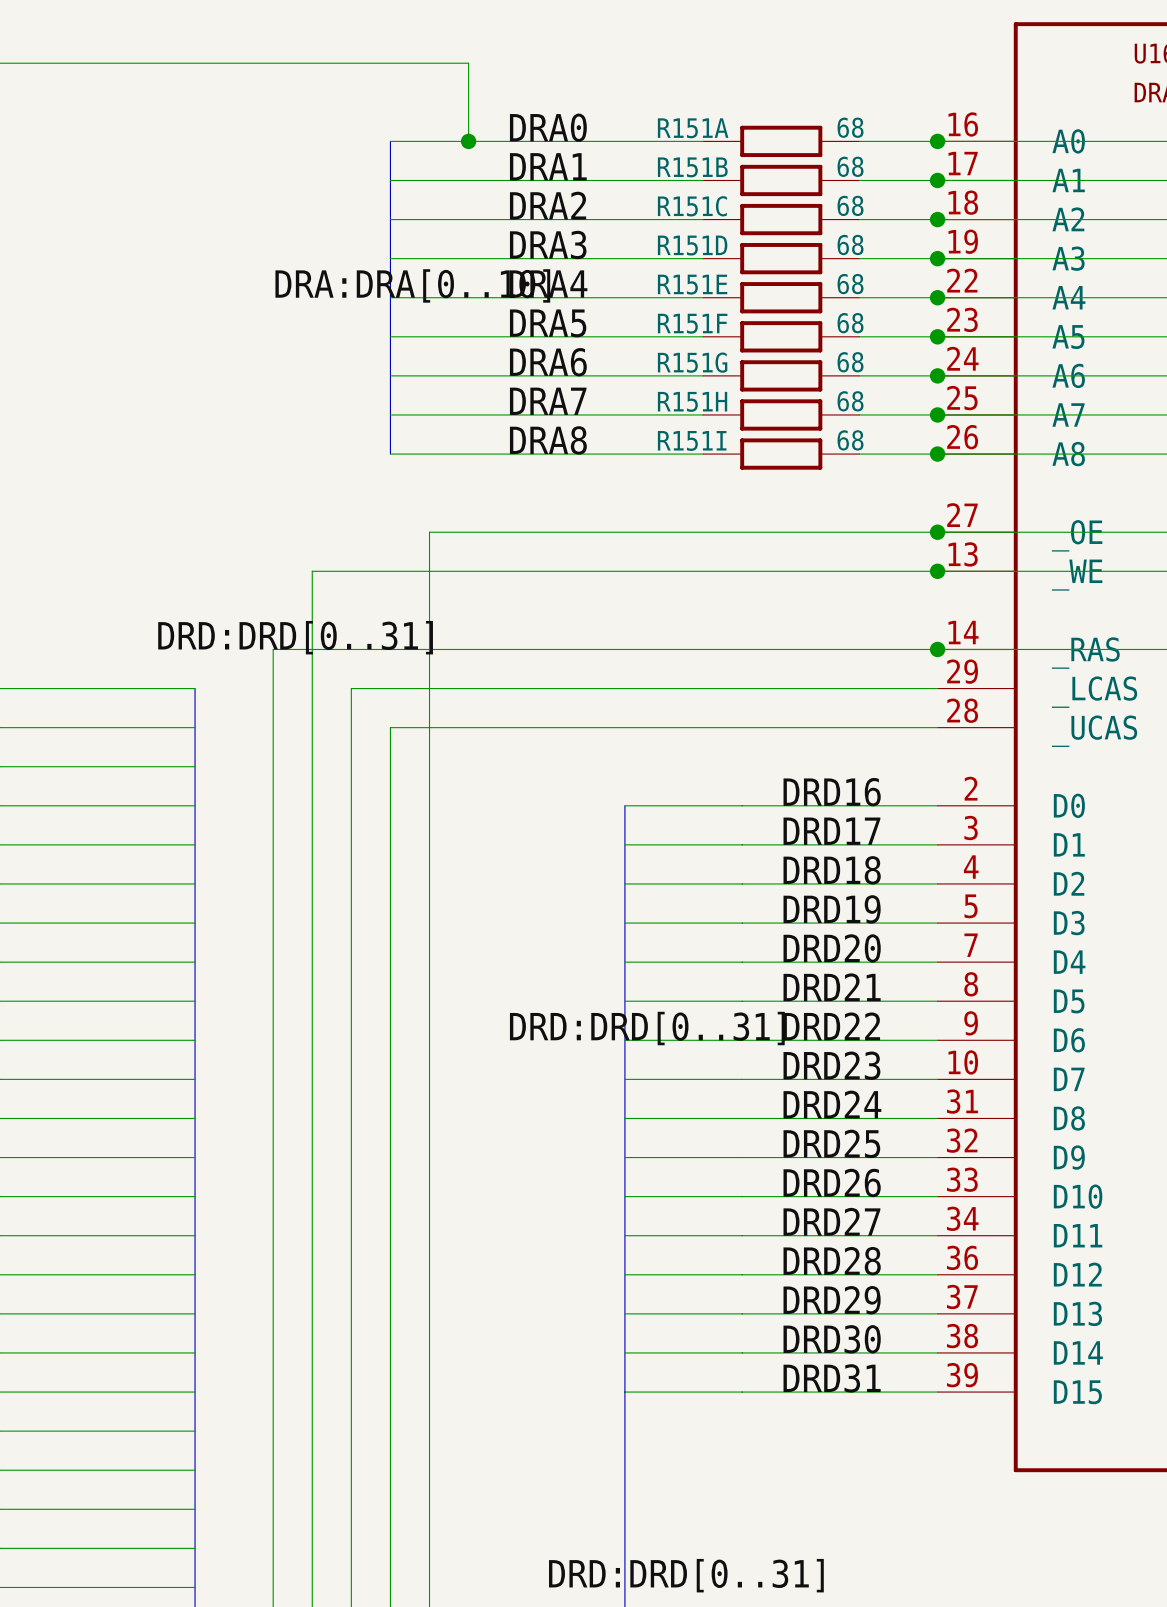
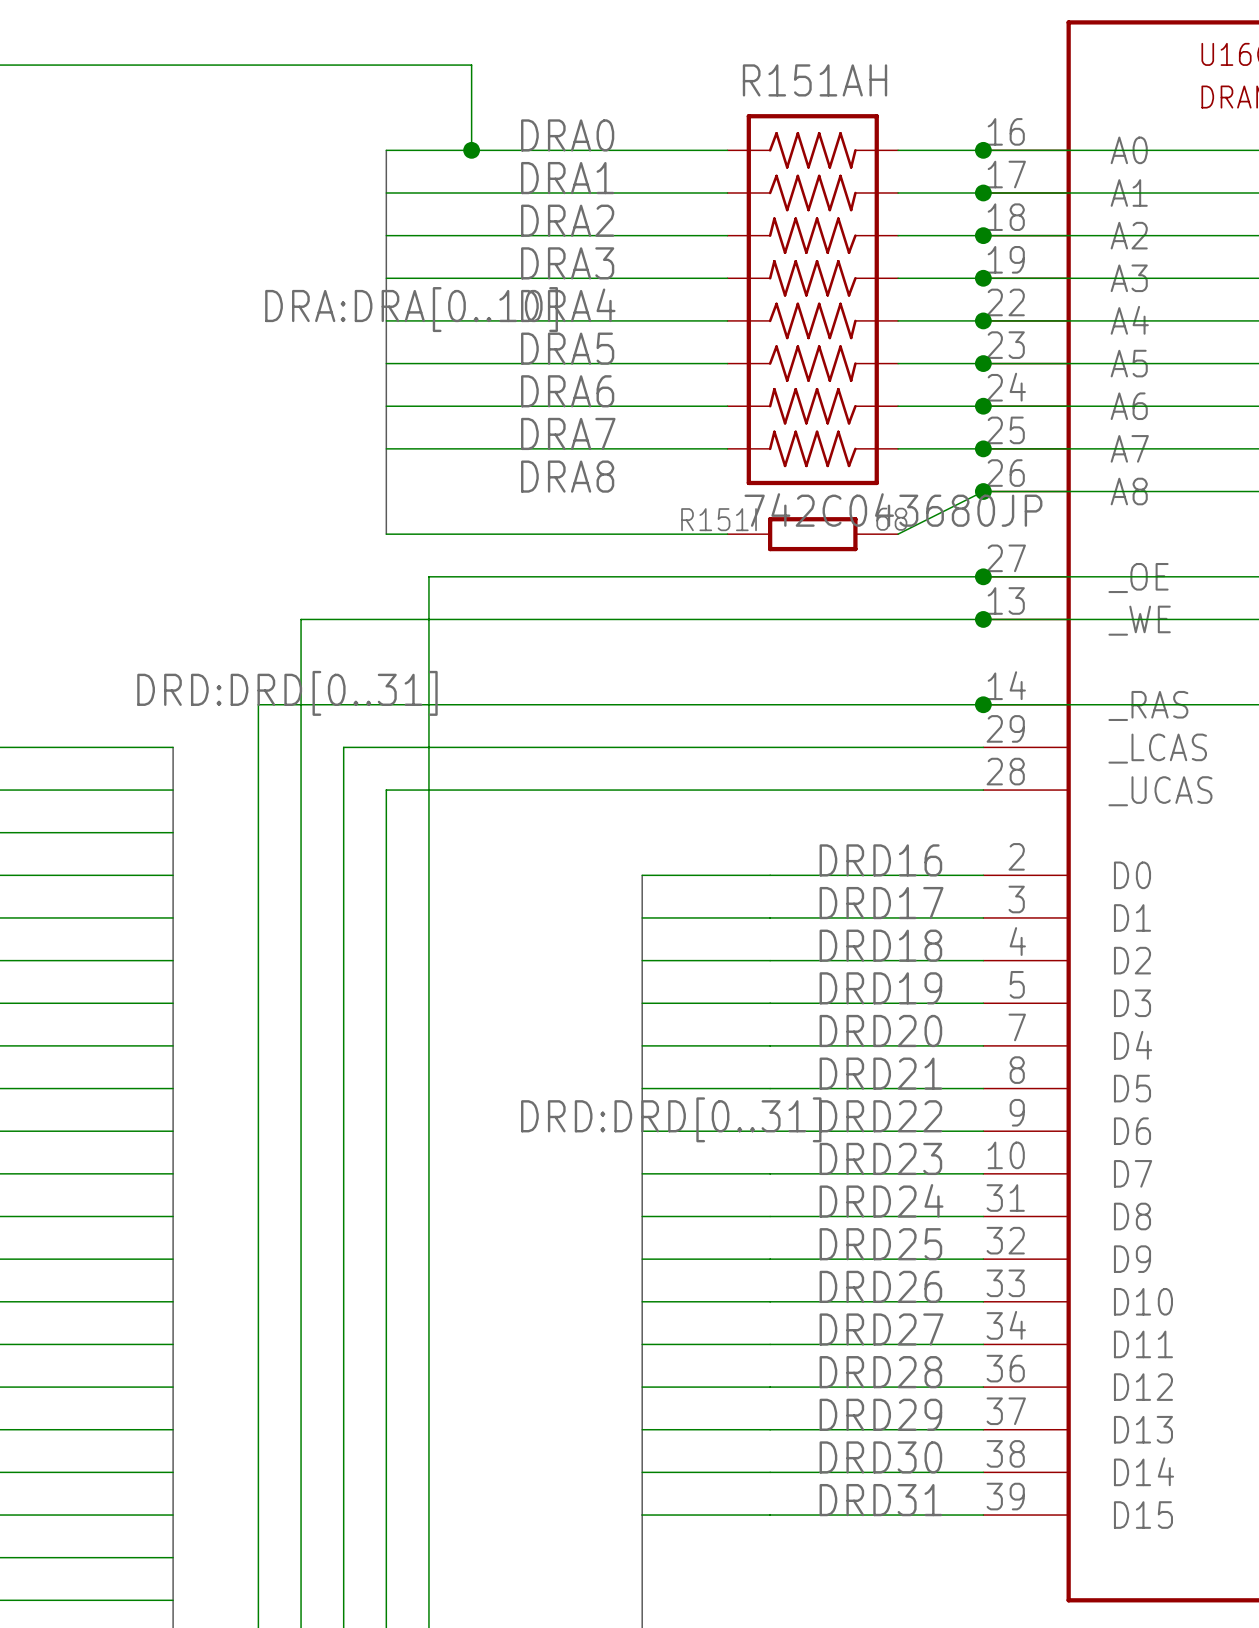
R151A: 68 (781, 141) -> none
R151B: 68 (781, 180) -> none
R151C: 68 (781, 219) -> none
R151D: 68 (781, 258) -> none
R151AH: none -> 742C043680JP (812, 299)
R151E: 68 (781, 297) -> none
R151F: 68 (781, 336) -> none
R151G: 68 (781, 375) -> none
R151H: 68 (781, 414) -> none
bus: none -> (386, 491) (386, 534)
wire: (390, 454) (703, 454) -> (386, 534) (727, 534)
R151I position: (781, 454) -> (812, 534)
wire: (859, 454) (937, 454) -> (898, 534) (983, 491)

